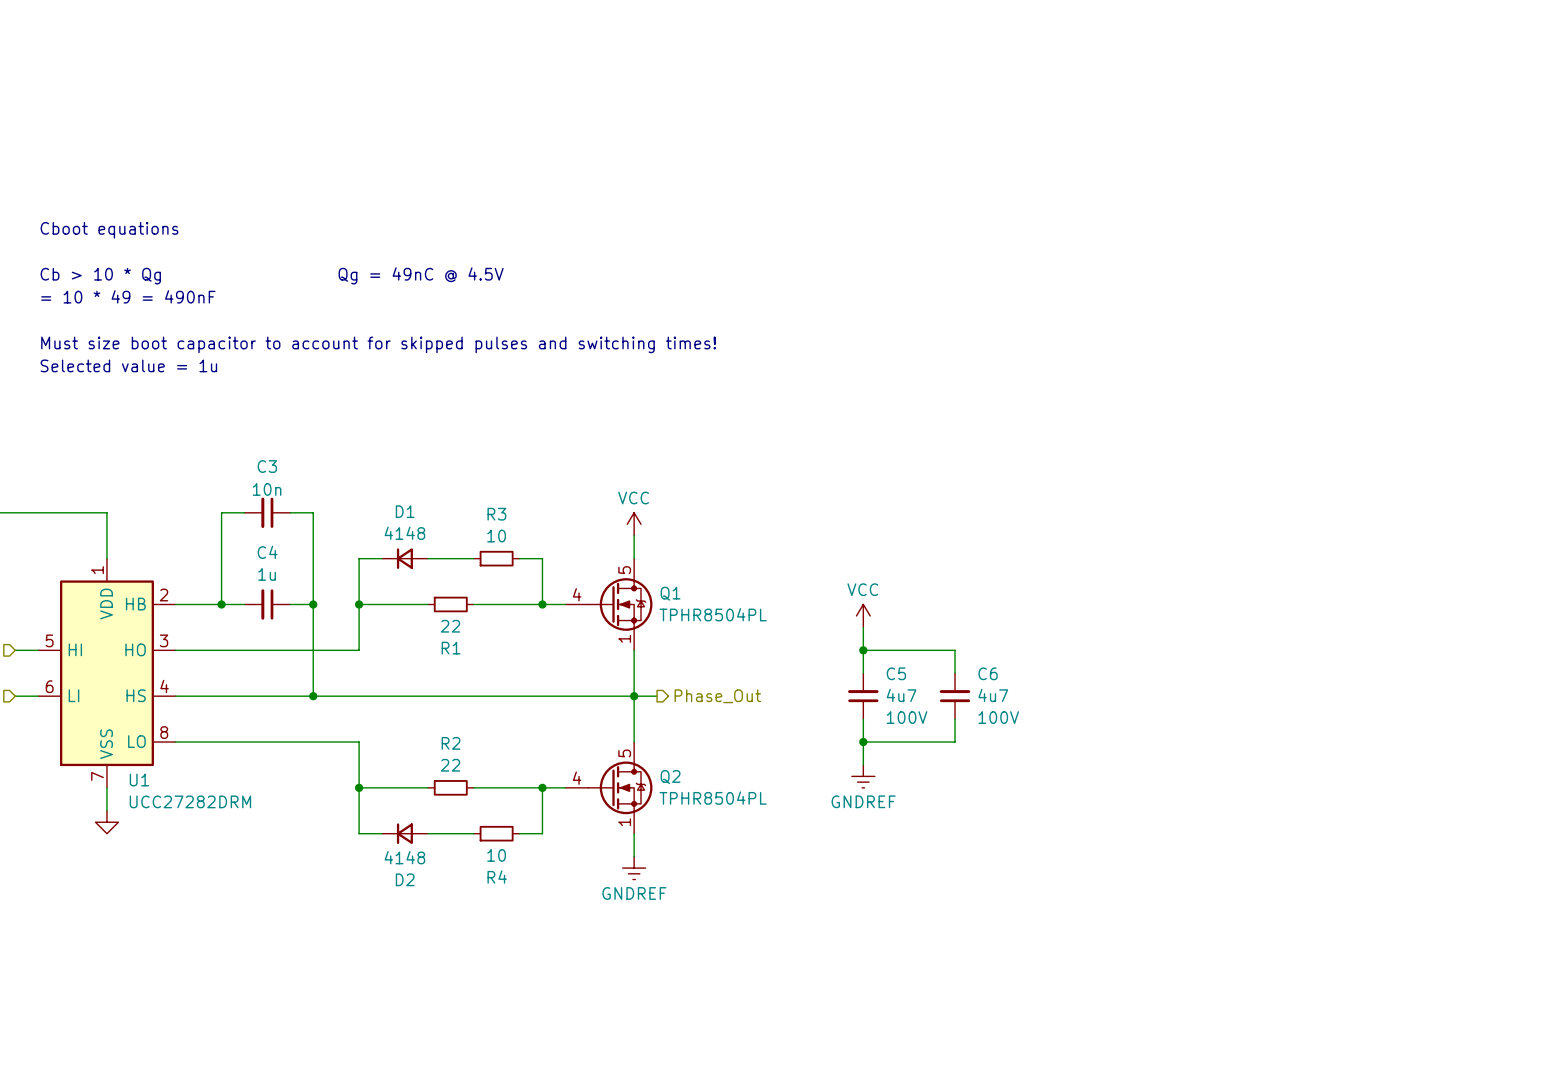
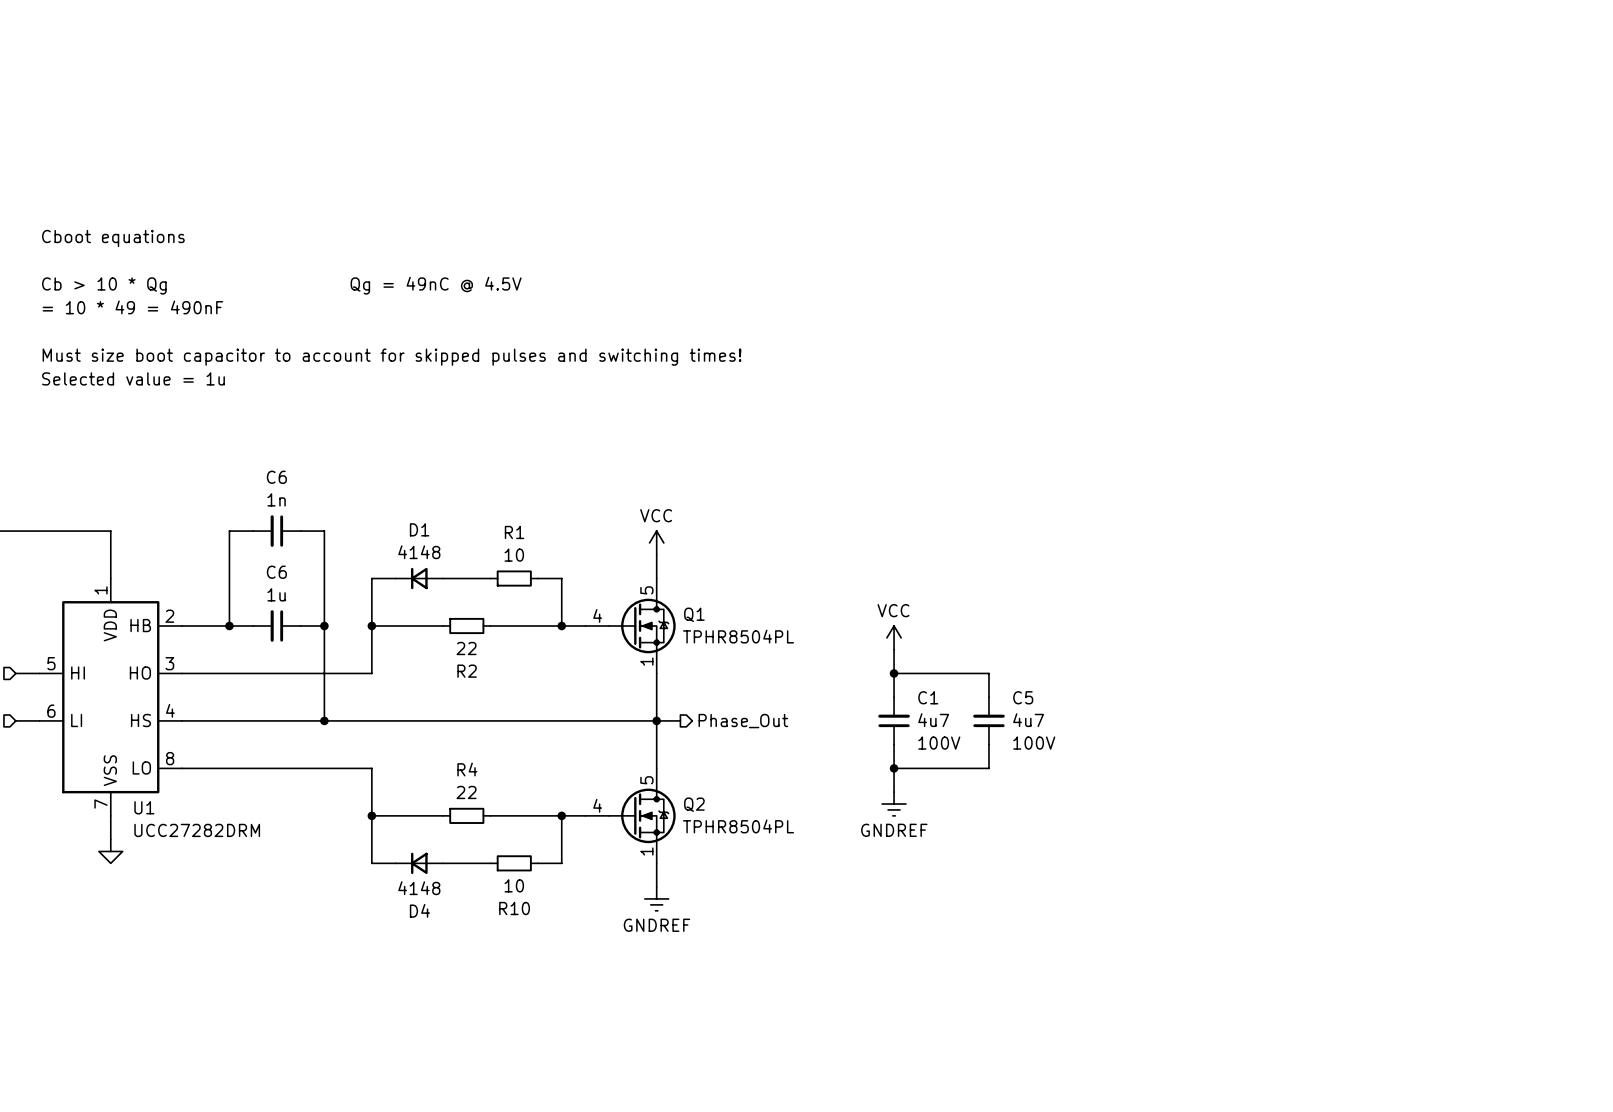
C3 name: C3 (267, 466) -> C6 (276, 477)
C3 value: 10n (267, 489) -> 1n (276, 499)
R3 name: R3 (496, 514) -> R1 (514, 532)
C4 name: C4 (267, 552) -> C6 (276, 572)
R1 name: R1 (451, 648) -> R2 (467, 671)
C5 name: C5 (896, 673) -> C1 (928, 697)
C6 name: C6 (988, 673) -> C5 (1023, 697)
R2 name: R2 (451, 743) -> R4 (467, 769)
R4 name: R4 (497, 877) -> R10 (514, 908)
D2 name: D2 (405, 879) -> D4 (419, 910)

